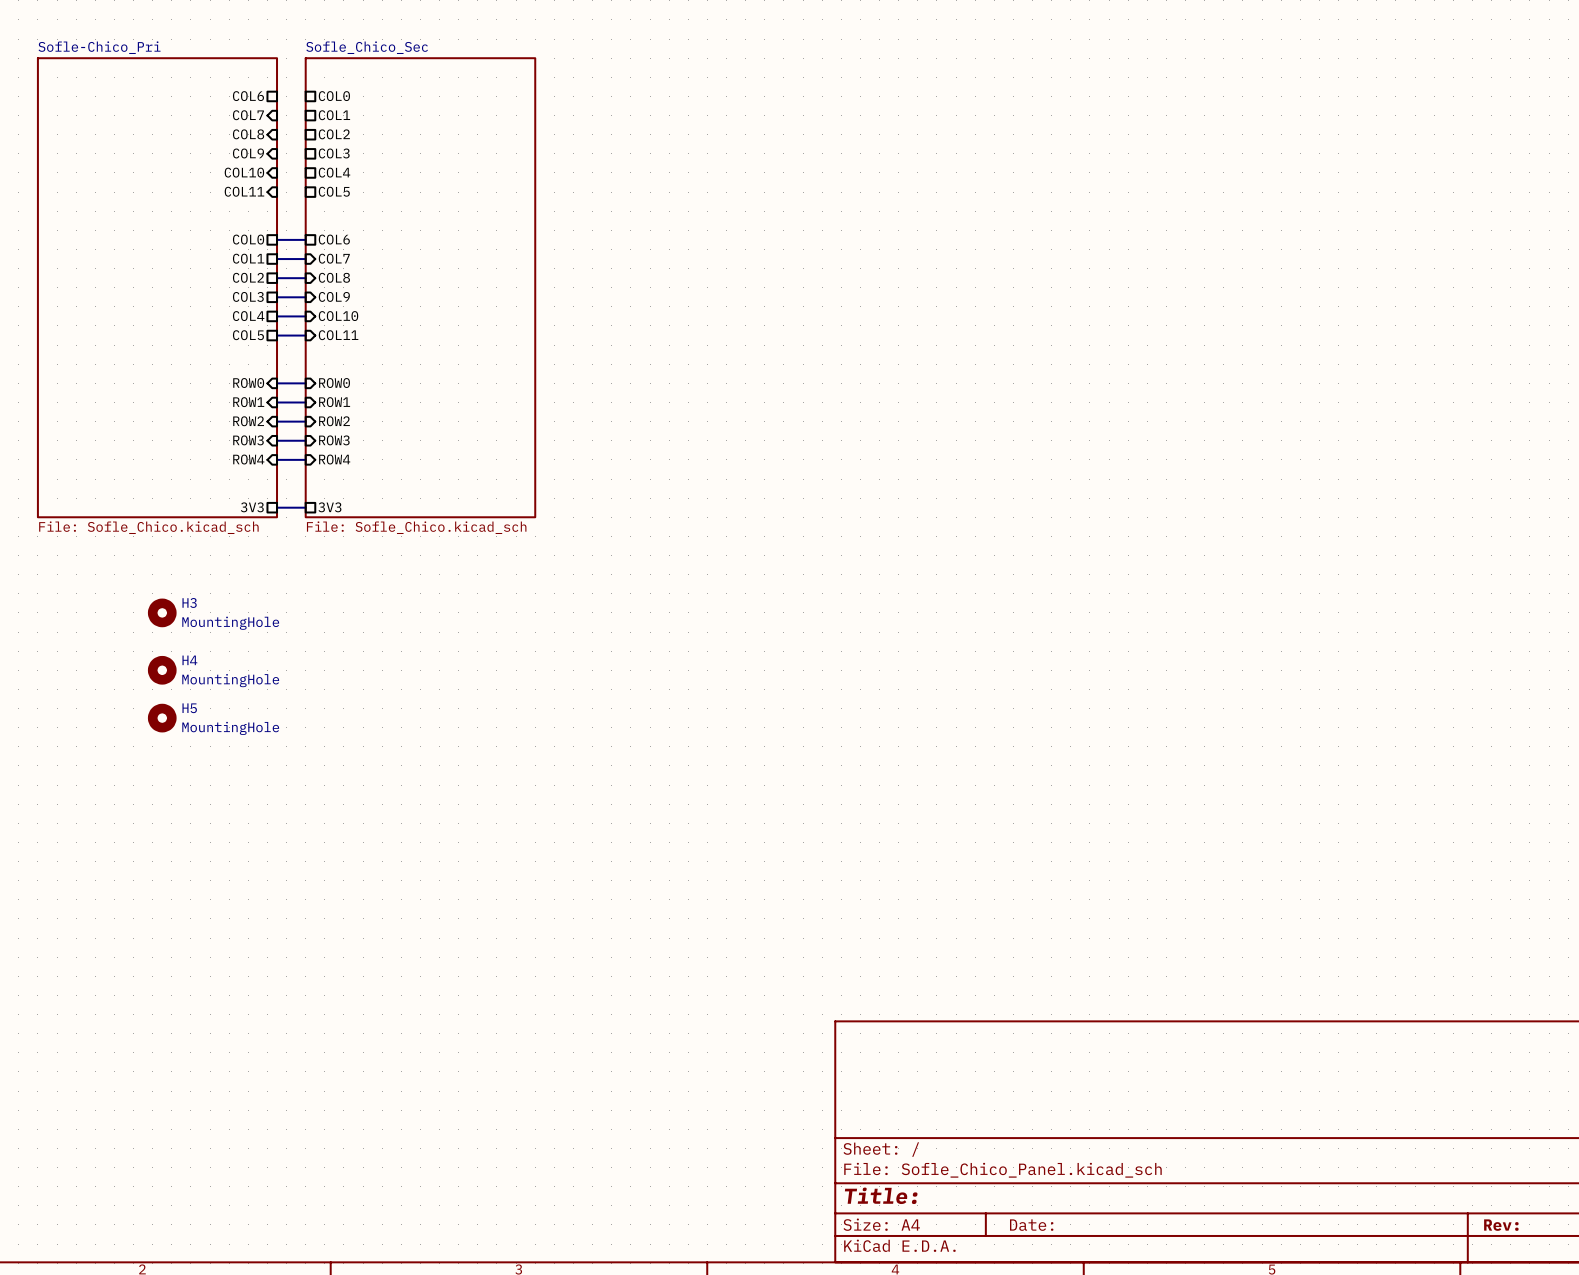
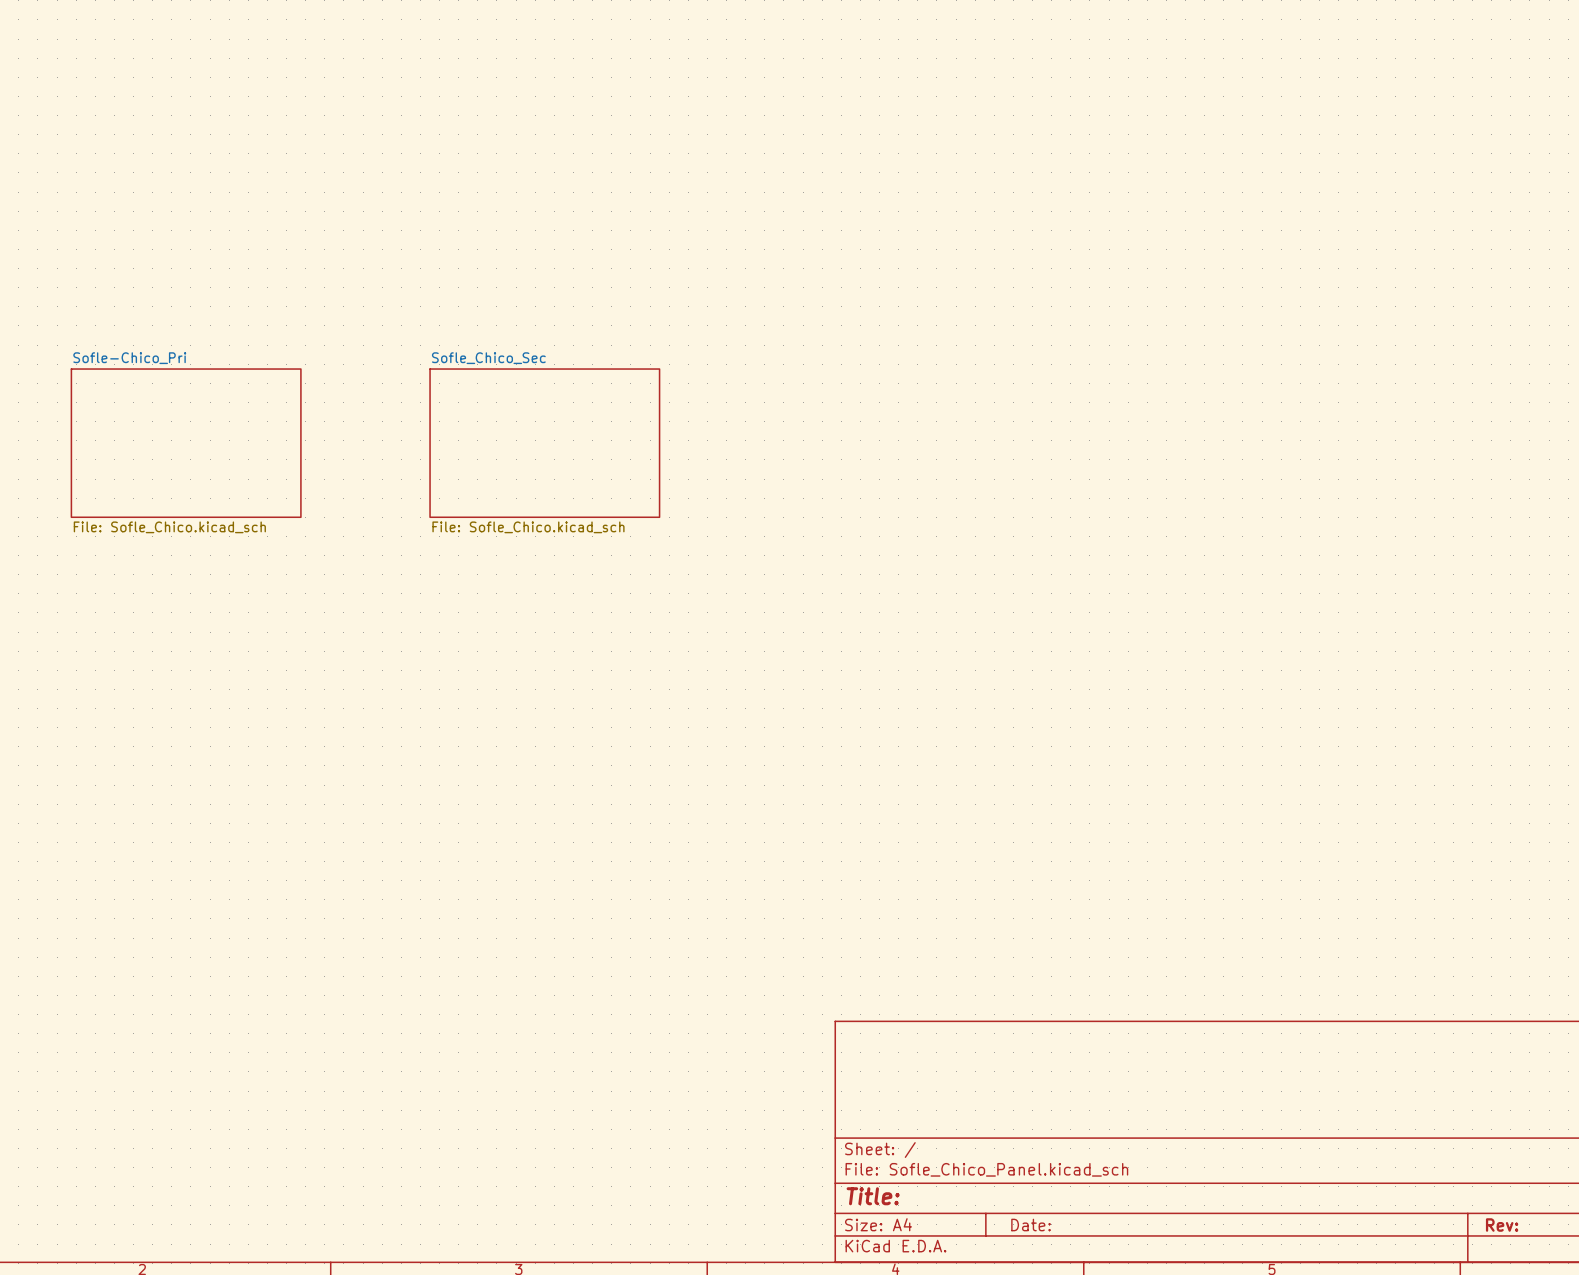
sheet pin: COL6 (248, 96) -> none
sheet pin: COL0 (334, 96) -> none
sheet pin: COL7 (248, 115) -> none
sheet pin: COL1 (334, 115) -> none
sheet pin: COL8 (248, 134) -> none
sheet pin: COL2 (334, 134) -> none
sheet pin: COL9 (248, 153) -> none
sheet pin: COL3 (334, 153) -> none
sheet pin: COL10 (244, 172) -> none
sheet pin: COL4 (334, 172) -> none
sheet pin: COL11 (244, 191) -> none
sheet pin: COL5 (334, 191) -> none
sheet pin: COL0 (248, 239) -> none
wire: (277, 239) (305, 239) -> none
sheet pin: COL6 (334, 239) -> none
sheet pin: COL1 (248, 258) -> none
sheet pin: COL7 (334, 258) -> none
wire: (277, 259) (305, 259) -> none
sheet pin: COL2 (248, 277) -> none
sheet pin: COL8 (334, 277) -> none
wire: (277, 278) (305, 278) -> none
sheet Sofle-Chico_Pri: File: Sofle_Chico.kicad_sch (157, 287) -> none
sheet Sofle_Chico_Sec: File: Sofle_Chico.kicad_sch (420, 287) -> none
sheet pin: COL3 (248, 296) -> none
sheet pin: COL9 (334, 296) -> none
wire: (277, 297) (305, 297) -> none
sheet pin: COL4 (248, 316) -> none
wire: (277, 316) (305, 316) -> none
sheet pin: COL10 (338, 316) -> none
sheet pin: COL5 (248, 335) -> none
wire: (277, 335) (305, 335) -> none
sheet pin: COL11 (338, 335) -> none
sheet pin: ROW0 (248, 383) -> none
wire: (277, 383) (305, 383) -> none
sheet pin: ROW0 (334, 383) -> none
sheet pin: ROW1 (248, 402) -> none
wire: (277, 402) (305, 402) -> none
sheet pin: ROW1 (334, 402) -> none
sheet pin: ROW2 (248, 421) -> none
wire: (277, 421) (305, 421) -> none
sheet pin: ROW2 (334, 421) -> none
sheet pin: ROW3 (248, 440) -> none
wire: (277, 440) (305, 440) -> none
sheet pin: ROW3 (334, 440) -> none
sheet Sofle-Chico_Pri: none -> File: Sofle_Chico.kicad_sch (186, 443)
sheet Sofle_Chico_Sec: none -> File: Sofle_Chico.kicad_sch (544, 443)
sheet pin: ROW4 (248, 459) -> none
wire: (277, 459) (305, 459) -> none
sheet pin: ROW4 (334, 459) -> none
sheet pin: 3V3 (252, 507) -> none
wire: (277, 507) (305, 507) -> none
sheet pin: 3V3 (329, 507) -> none
H3: MountingHole (162, 612) -> none
H4: MountingHole (162, 670) -> none
H5: MountingHole (162, 718) -> none

